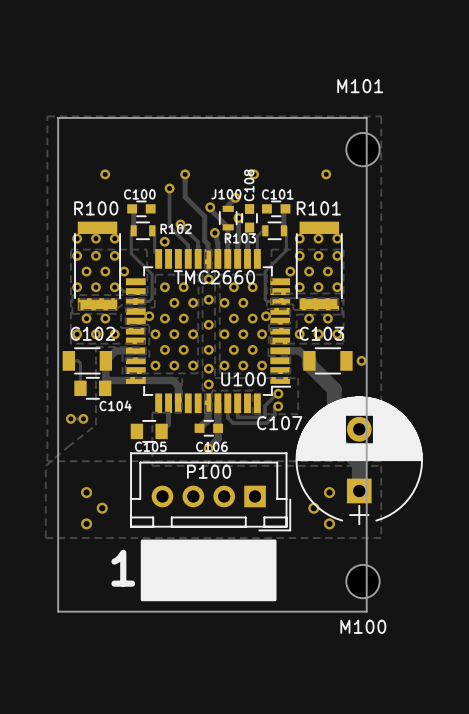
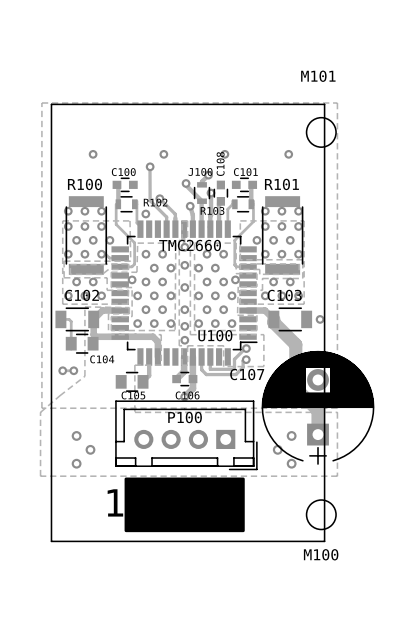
track: (185, 174) (185, 196) (204, 216) (204, 240) (208, 244) (208, 258) -> none

